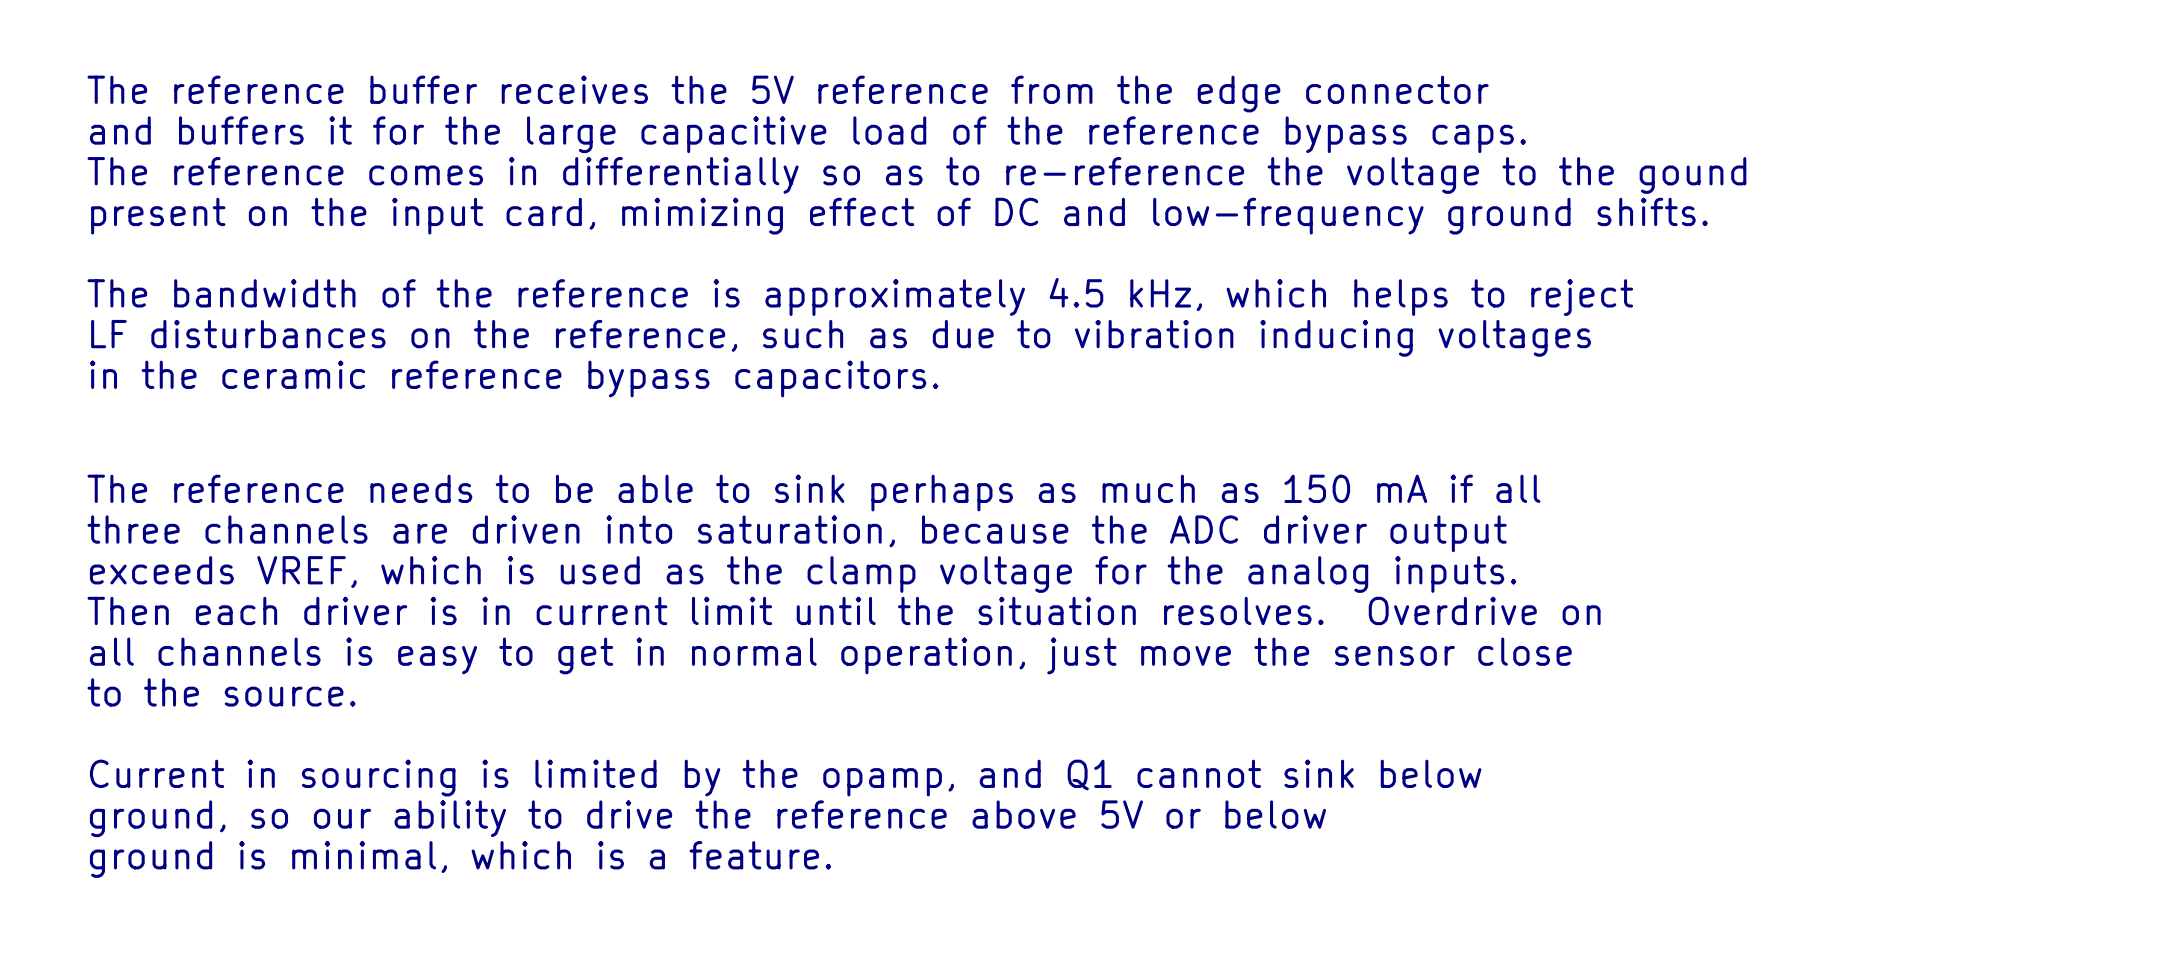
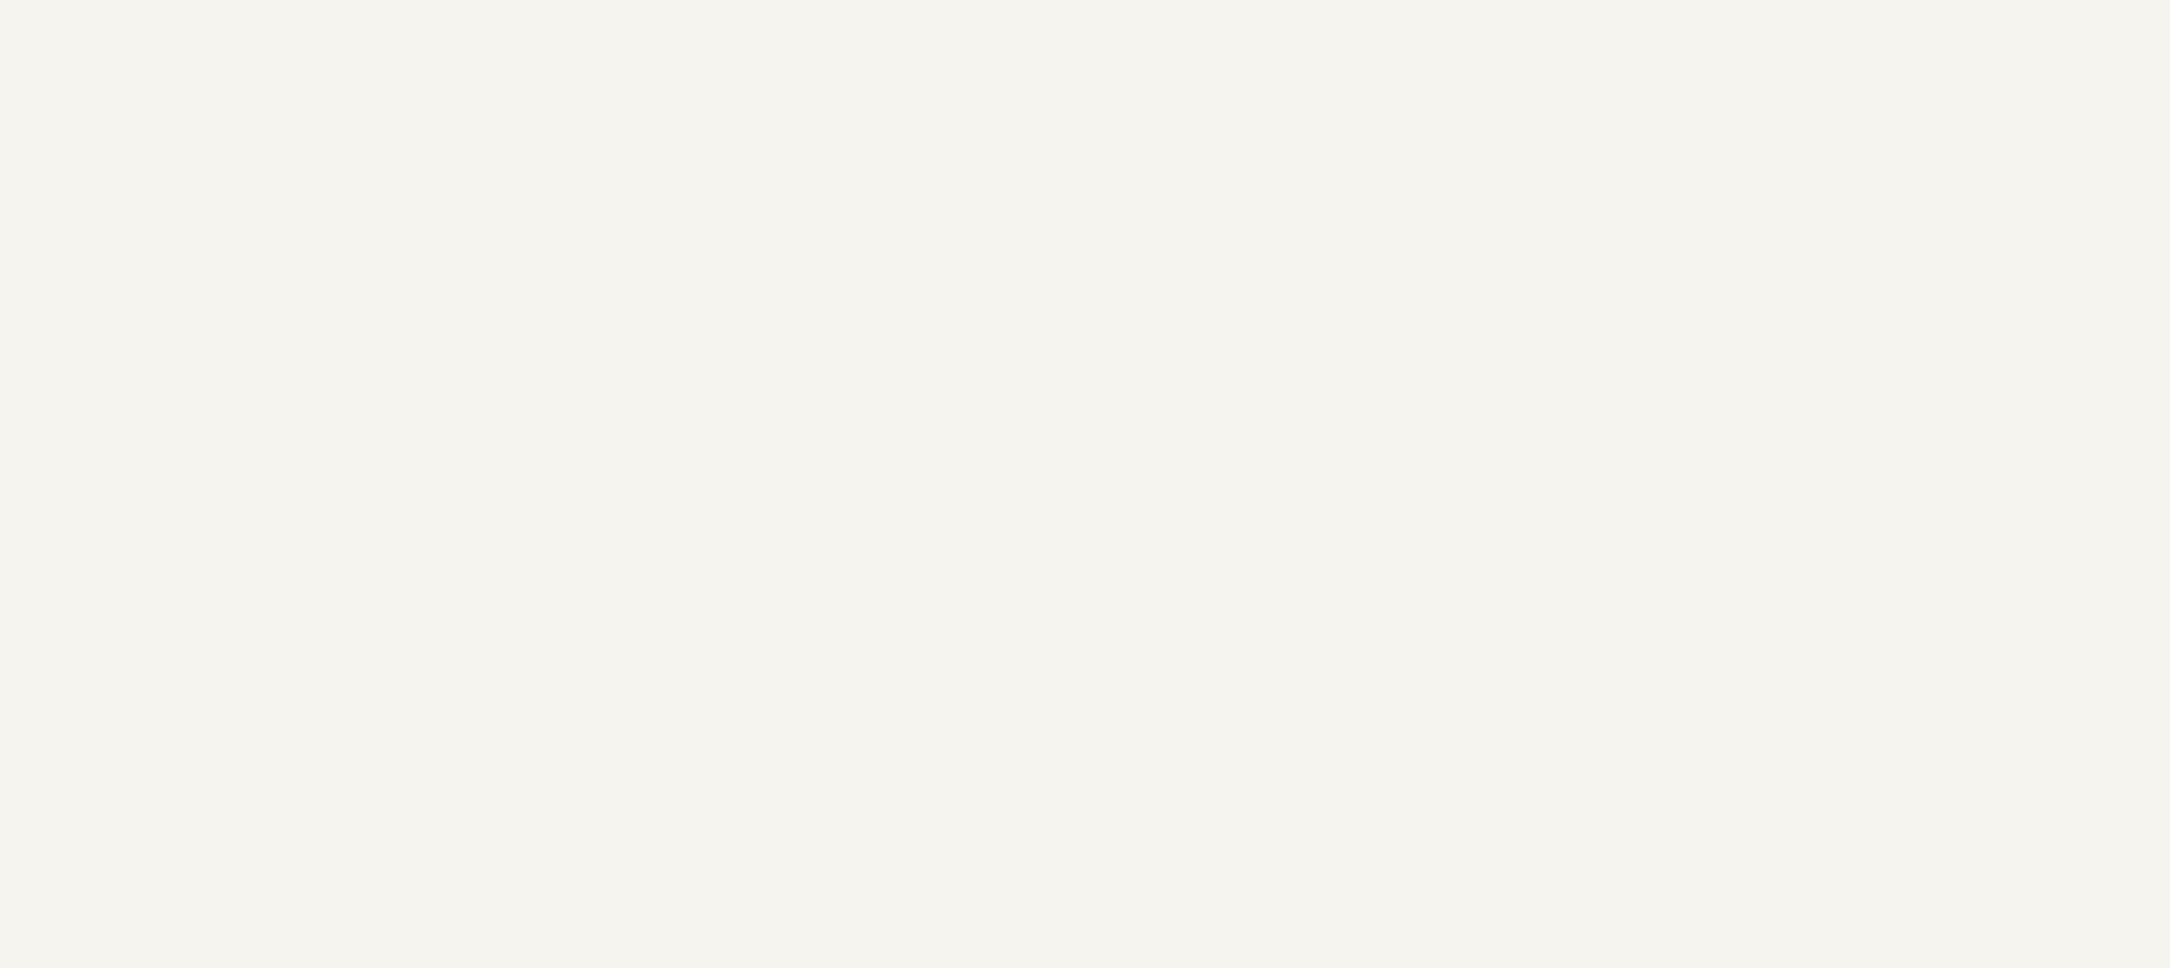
text: The reference buffer receives the 5V reference from the edge connector (788, 94) -> none
text: and buffers it for the large capacitive load of the reference bypass caps. (807, 134) -> none
text: The reference comes in differentially so as to re-reference the voltage to the gound (916, 175) -> none
text: present on the input card, mimizing effect of DC and low-frequency ground shifts. (899, 216) -> none
text: The bandwidth of the reference is approximately 4.5 kHz, which helps to reject (860, 296) -> none
text: LF disturbances on the reference, such as due to vibration inducing voltages (841, 338) -> none
text: in the ceramic reference bypass capacitors. (514, 379) -> none
text: The reference needs to be able to sink perhaps as much as 150 mA if all (813, 493) -> none
text: three channels are driven into saturation, because the ADC driver output (797, 533) -> none
text: exceeds VREF, which is used as the clamp voltage for the analog inputs. (803, 574) -> none
text: Then each driver is in current limit until the situation resolves. Overdrive on (844, 610) -> none
text: all channels is easy to get in normal operation, just move the sensor close (830, 655) -> none
text: to the source. (221, 692) -> none
text: Current in sourcing is limited by the opamp, and Q1 cannot sink below (785, 778) -> none
text: ground, so our ability to drive the reference above 5V or below (707, 818) -> none
text: ground is minimal, which is a feature. (460, 859) -> none

